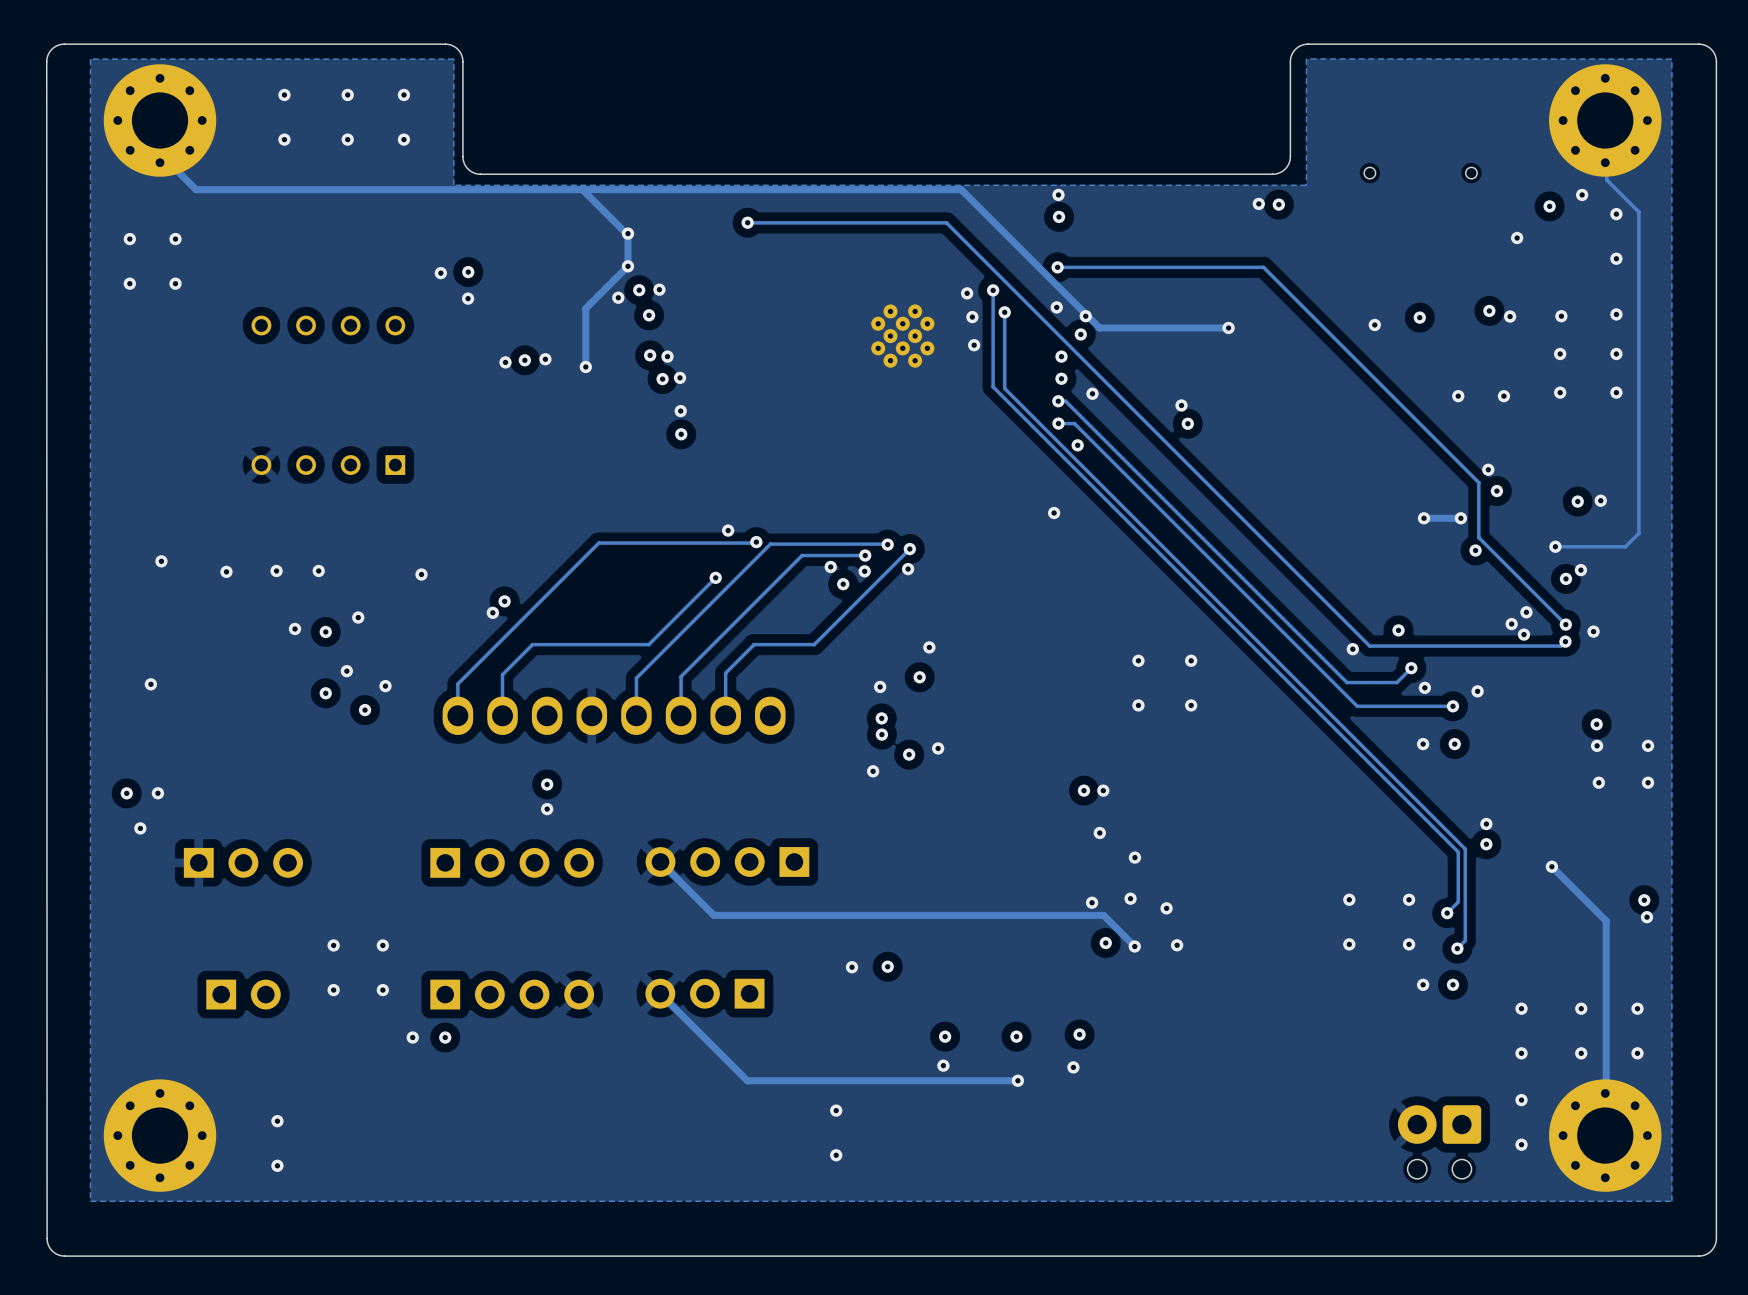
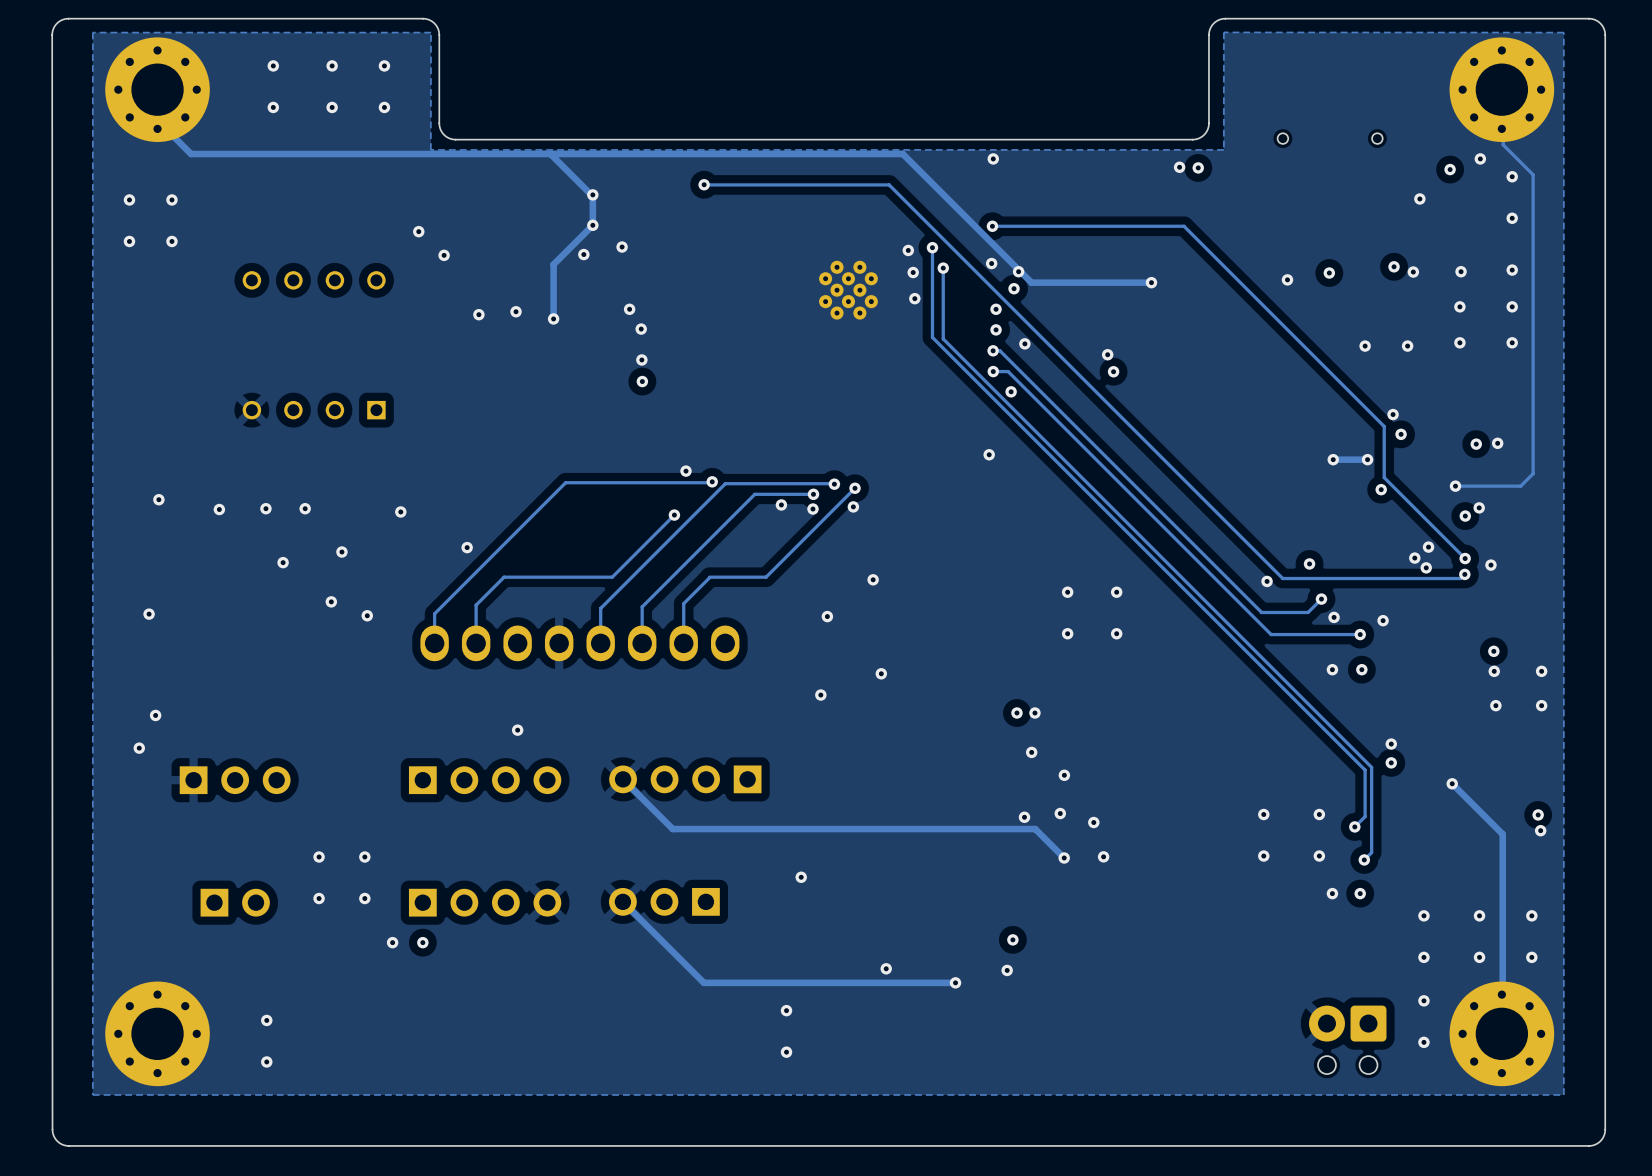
via: (1059, 216) -> none
via: (468, 272) -> none
via: (639, 290) -> none
via: (649, 315) -> none
via: (650, 355) -> none
via: (524, 360) -> none
via: (662, 379) -> none
via: (843, 584) -> none
via: (504, 601) -> none
via: (325, 631) -> none
via: (919, 677) -> none
via: (325, 693) -> none
via: (365, 710) -> none
via: (881, 718) -> none
via: (881, 734) -> none
via: (909, 754) -> none
via: (547, 784) -> none
via: (126, 793) -> none
via: (1105, 942) -> none
via: (887, 966) -> none
via: (945, 1036) -> none
via: (1016, 1036) -> none

